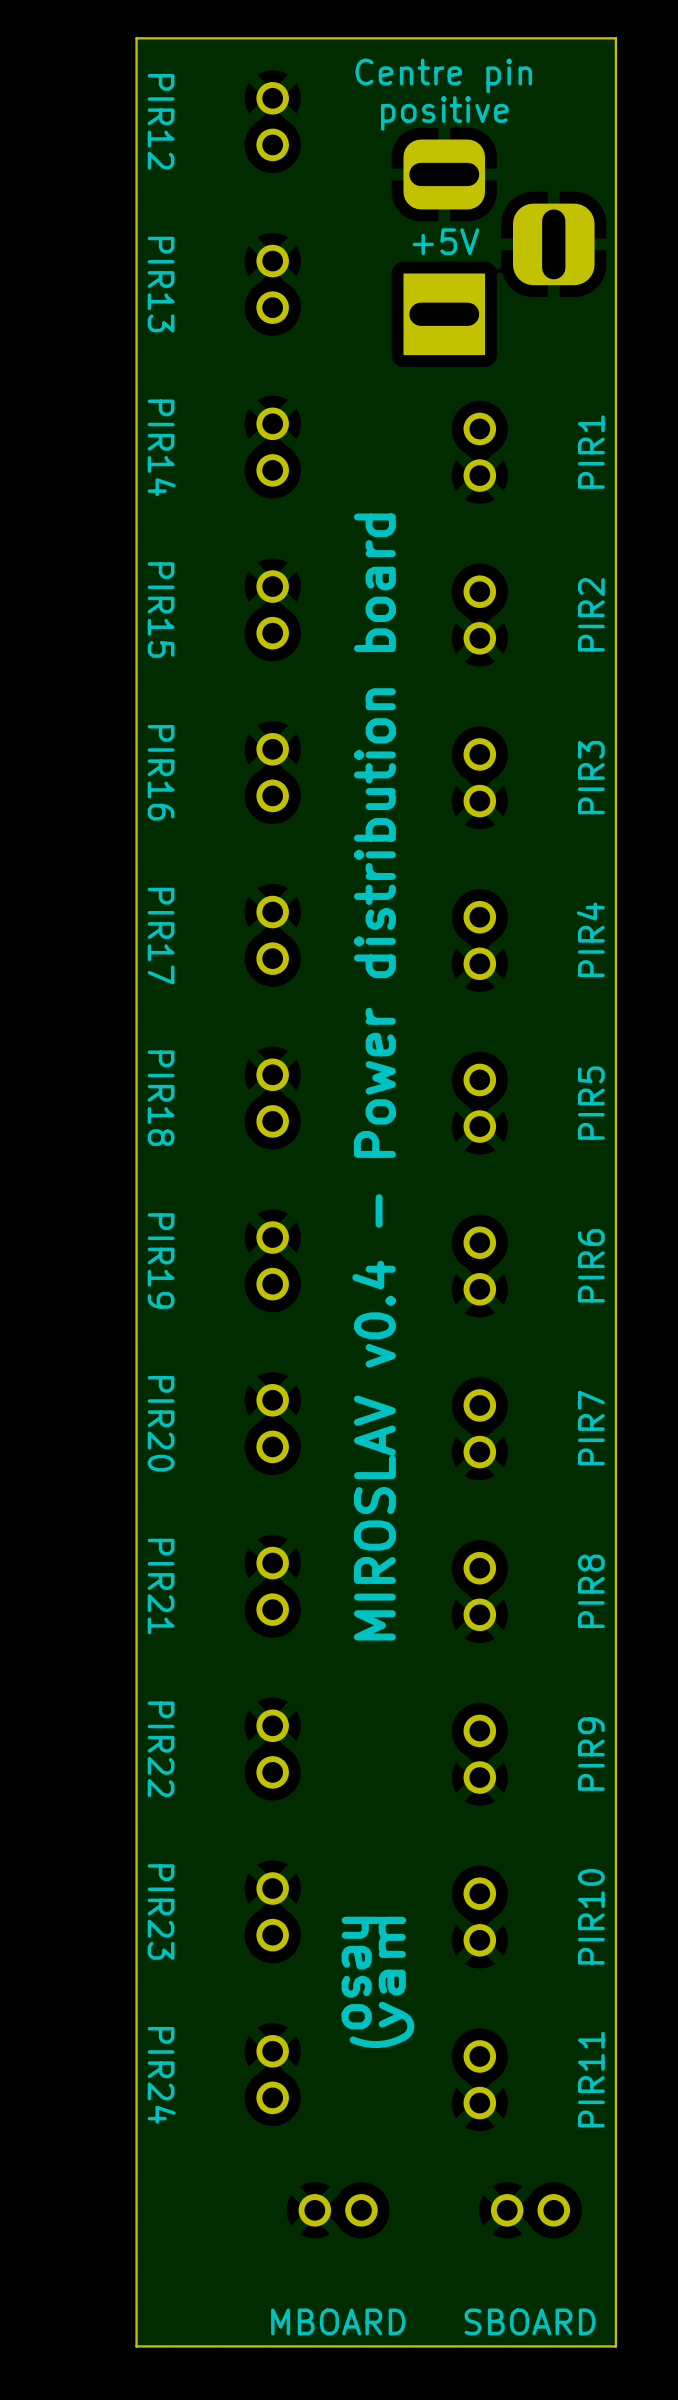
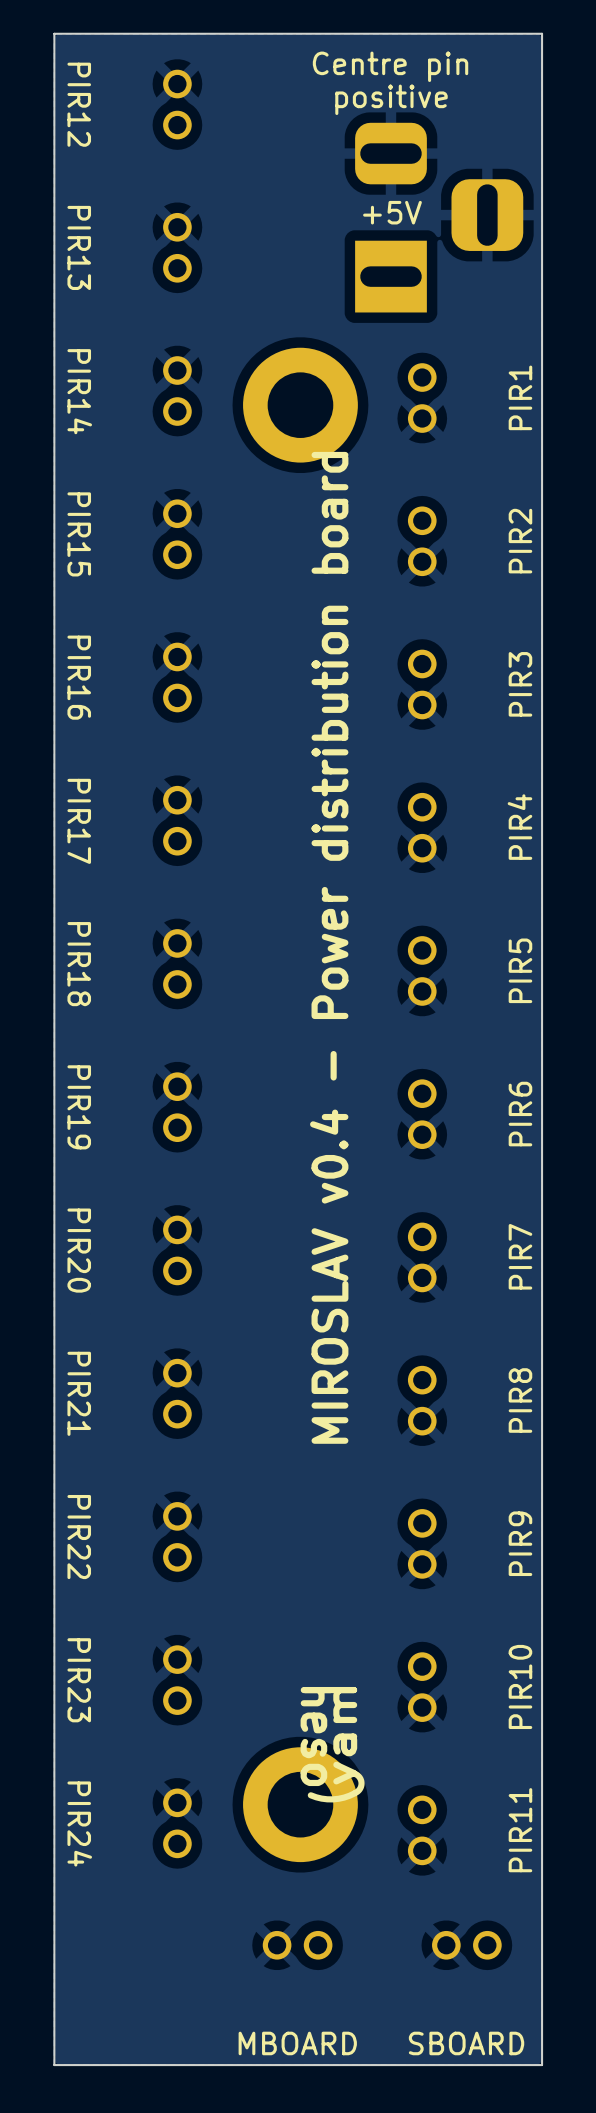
board edge: (136, 38) (136, 2346) -> (120, 33) (54, 33) (54, 2065) (120, 2065)
PIR12 position: (272, 121) -> (177, 104)
PIR13 position: (272, 284) -> (177, 247)
PIR14 position: (272, 447) -> (177, 391)
part: none -> (300, 405)
PIR15 position: (272, 609) -> (177, 534)
PIR16 position: (272, 772) -> (177, 677)
PIR17 position: (272, 935) -> (177, 820)
PIR18 position: (272, 1098) -> (177, 963)
PIR19 position: (272, 1260) -> (177, 1107)
PIR20 position: (272, 1423) -> (177, 1250)
PIR21 position: (272, 1586) -> (177, 1393)
PIR22 position: (272, 1749) -> (177, 1536)
PIR23 position: (272, 1911) -> (177, 1680)
part: none -> (300, 1804)
PIR24 position: (272, 2074) -> (177, 1823)

